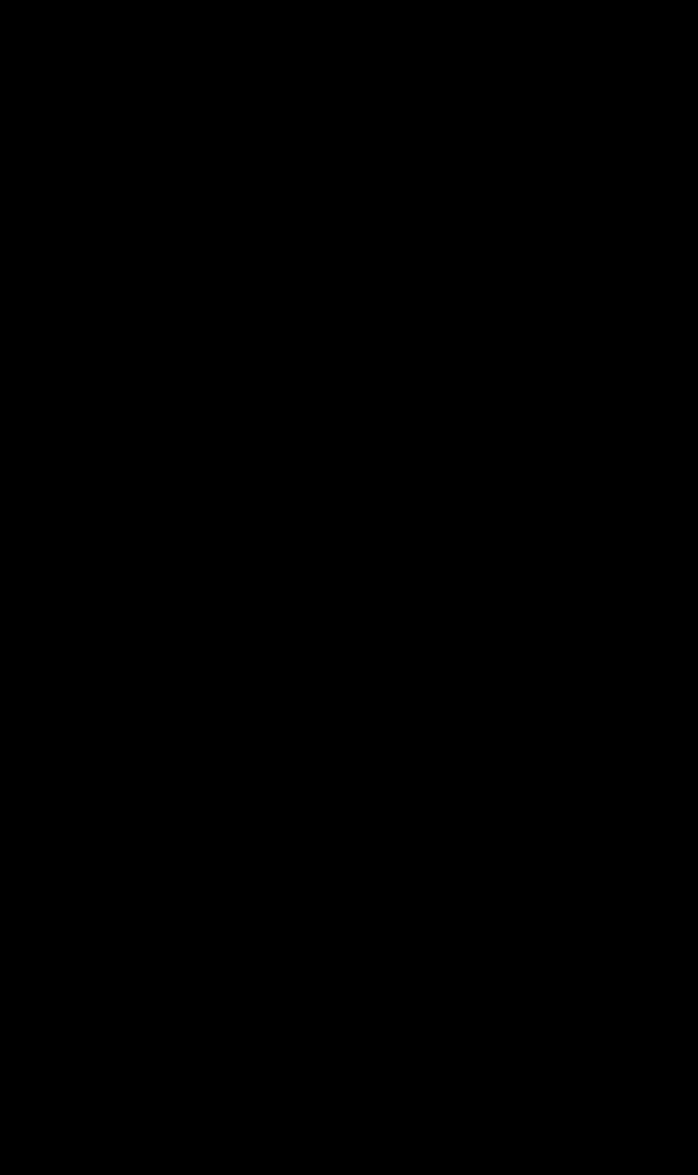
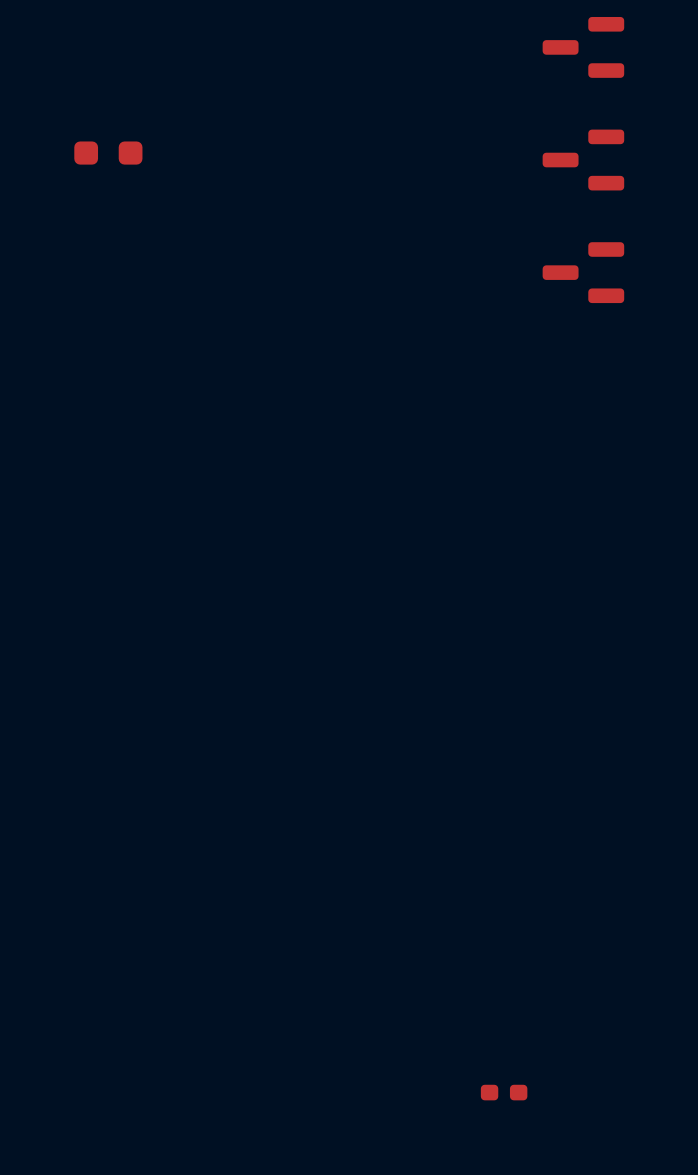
part: none -> (583, 47)
part: none -> (108, 153)
part: none -> (583, 160)
part: none -> (583, 272)
part: none -> (504, 1092)

